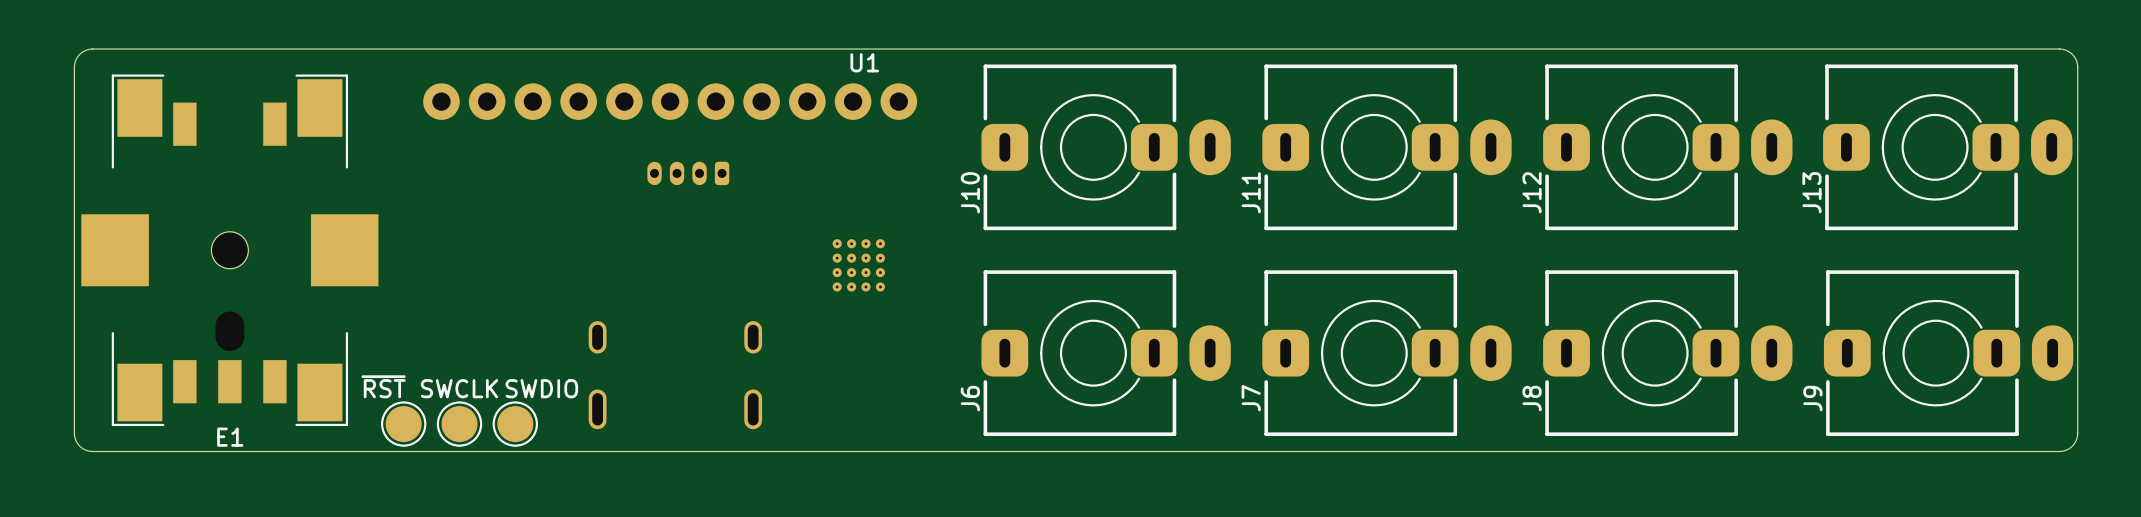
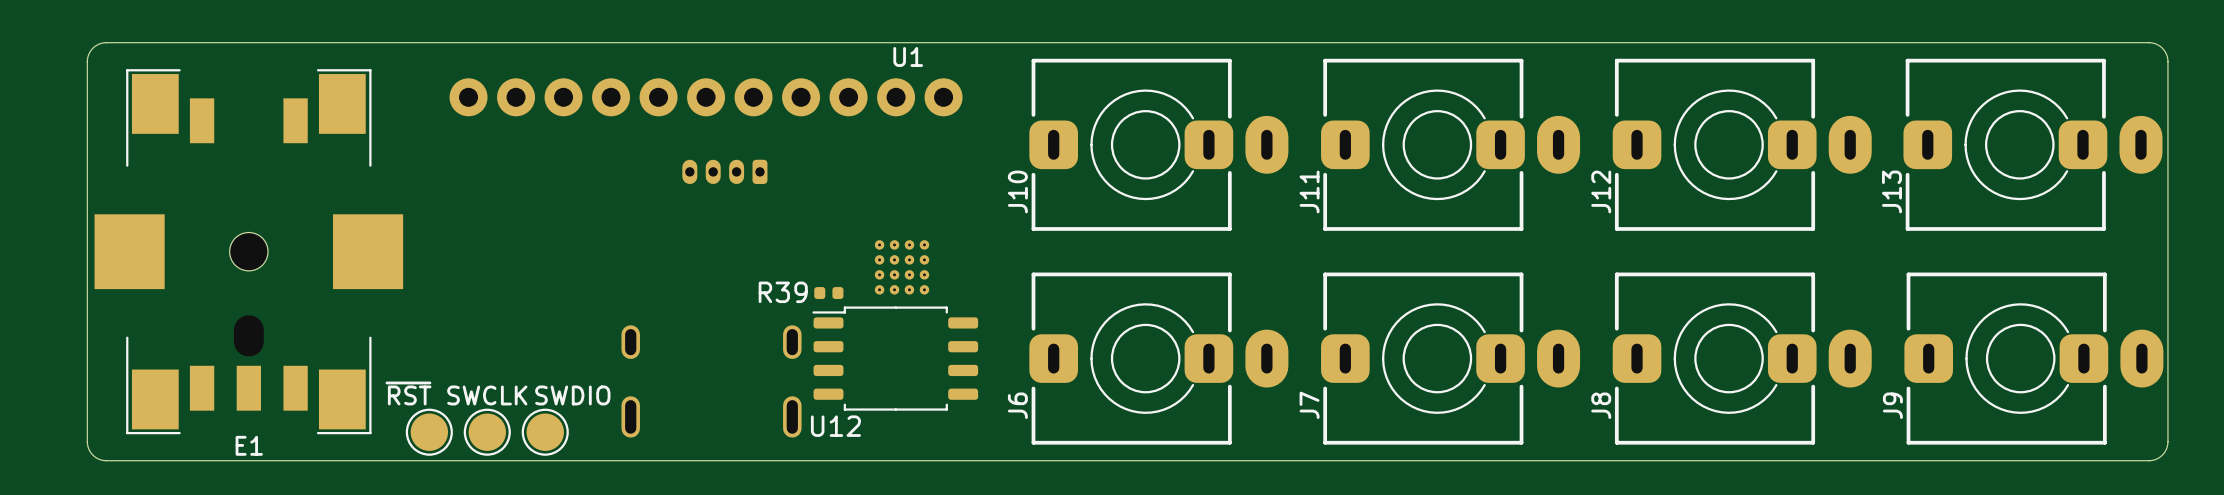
R39: none -> (828, 293)
U12: none -> (895, 358)

